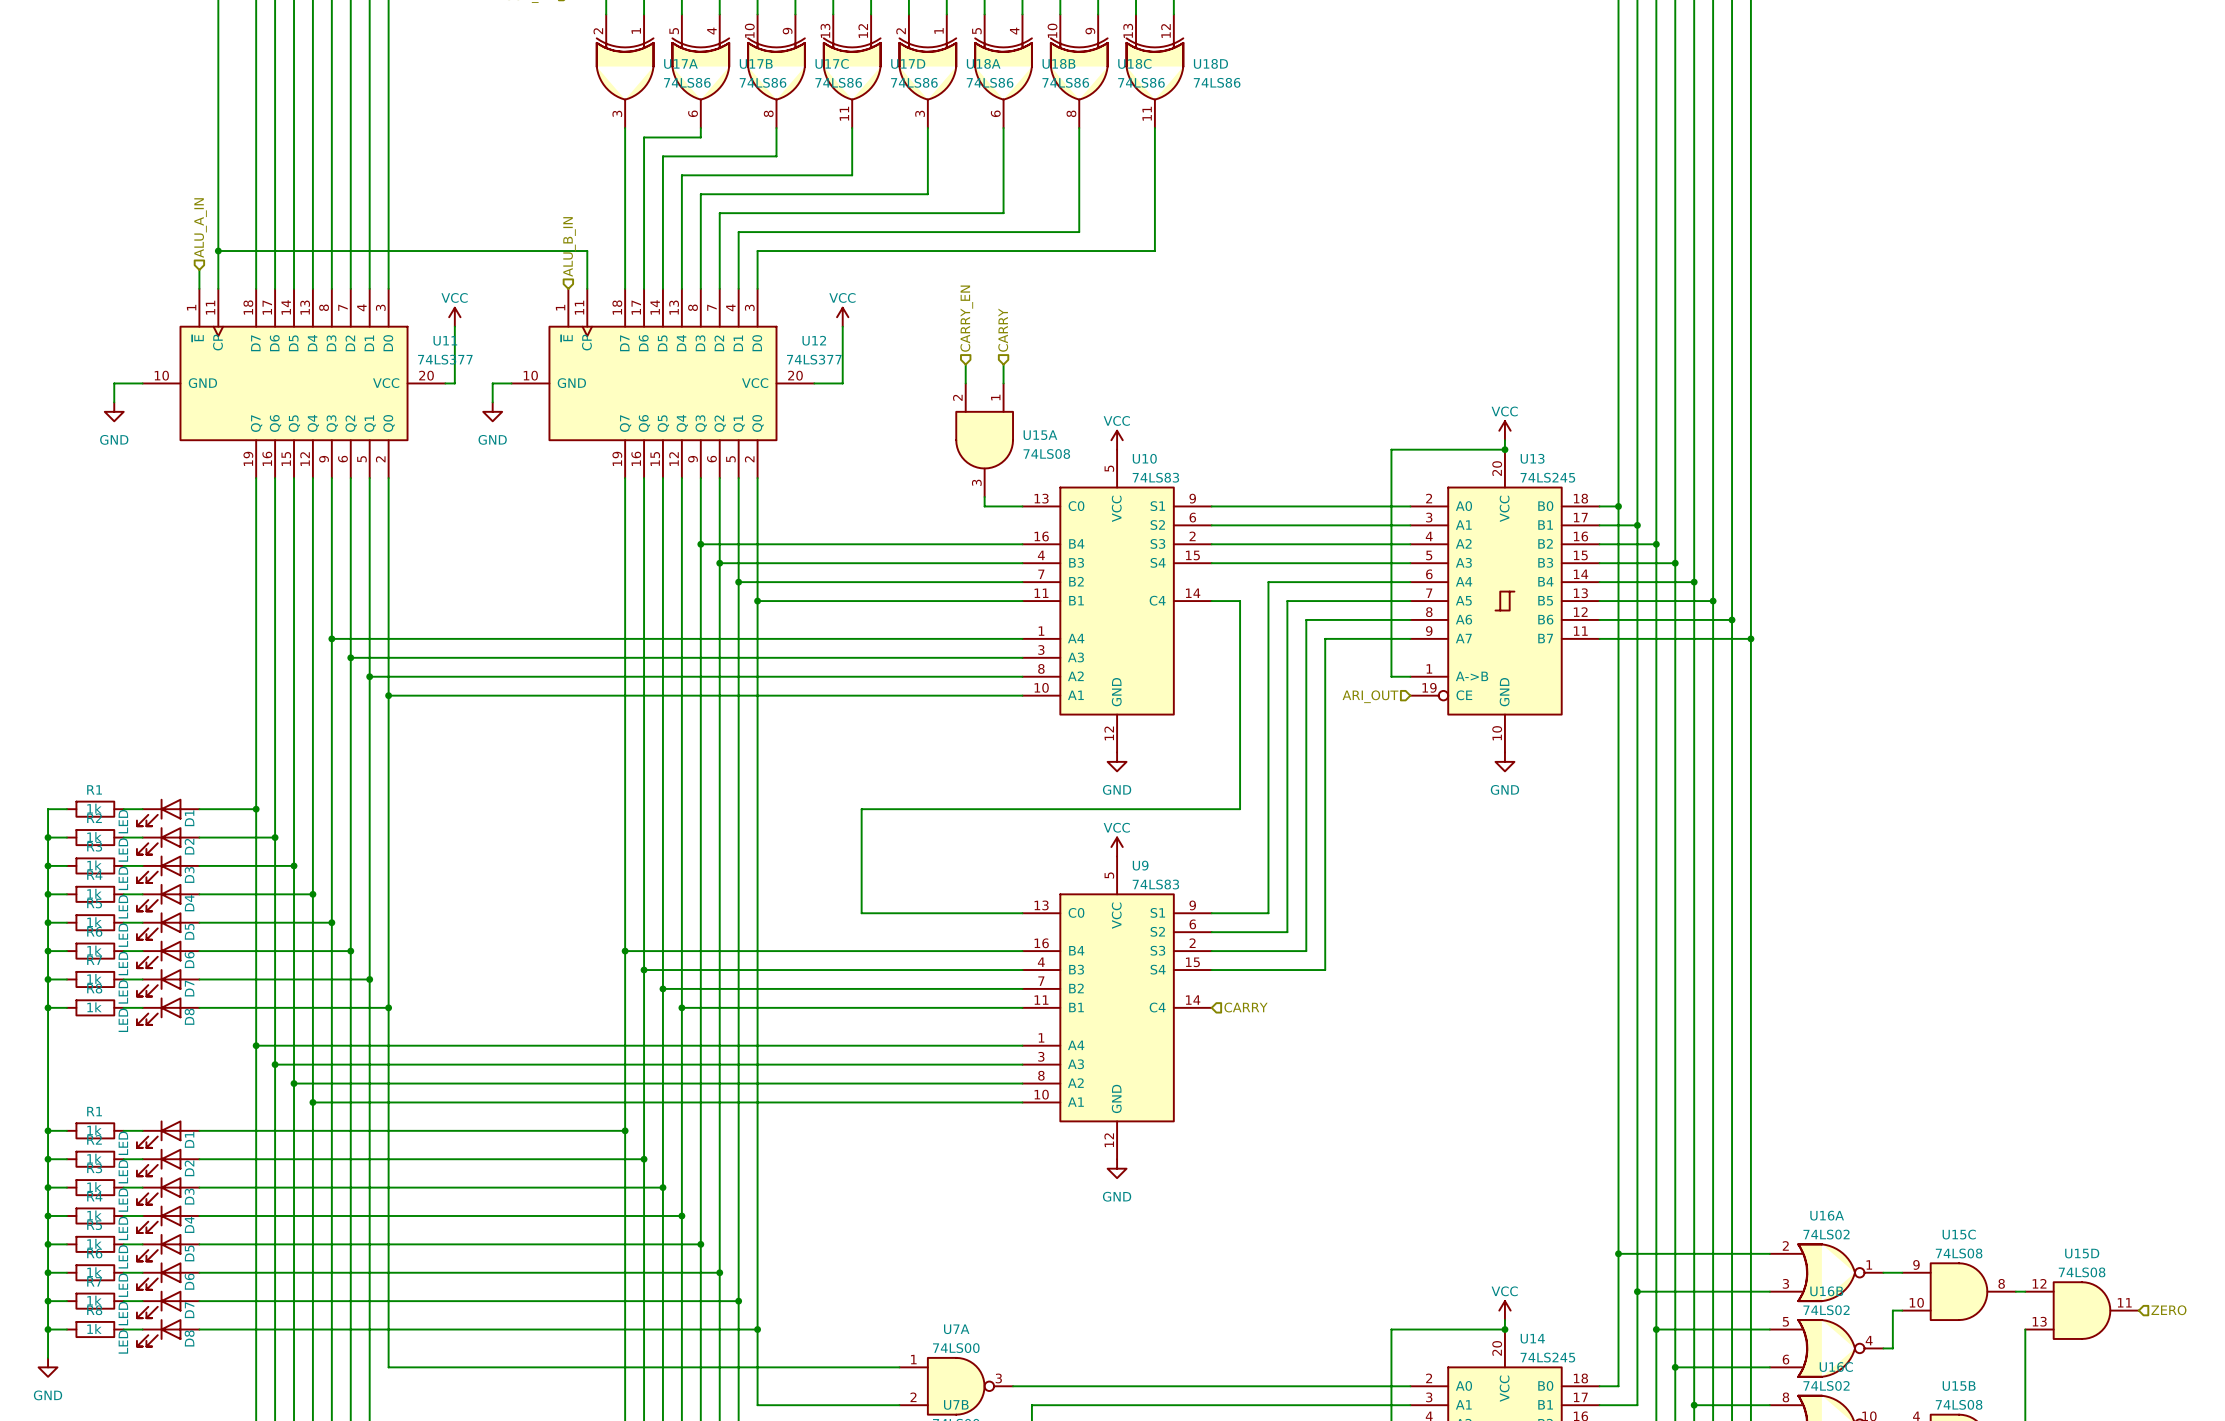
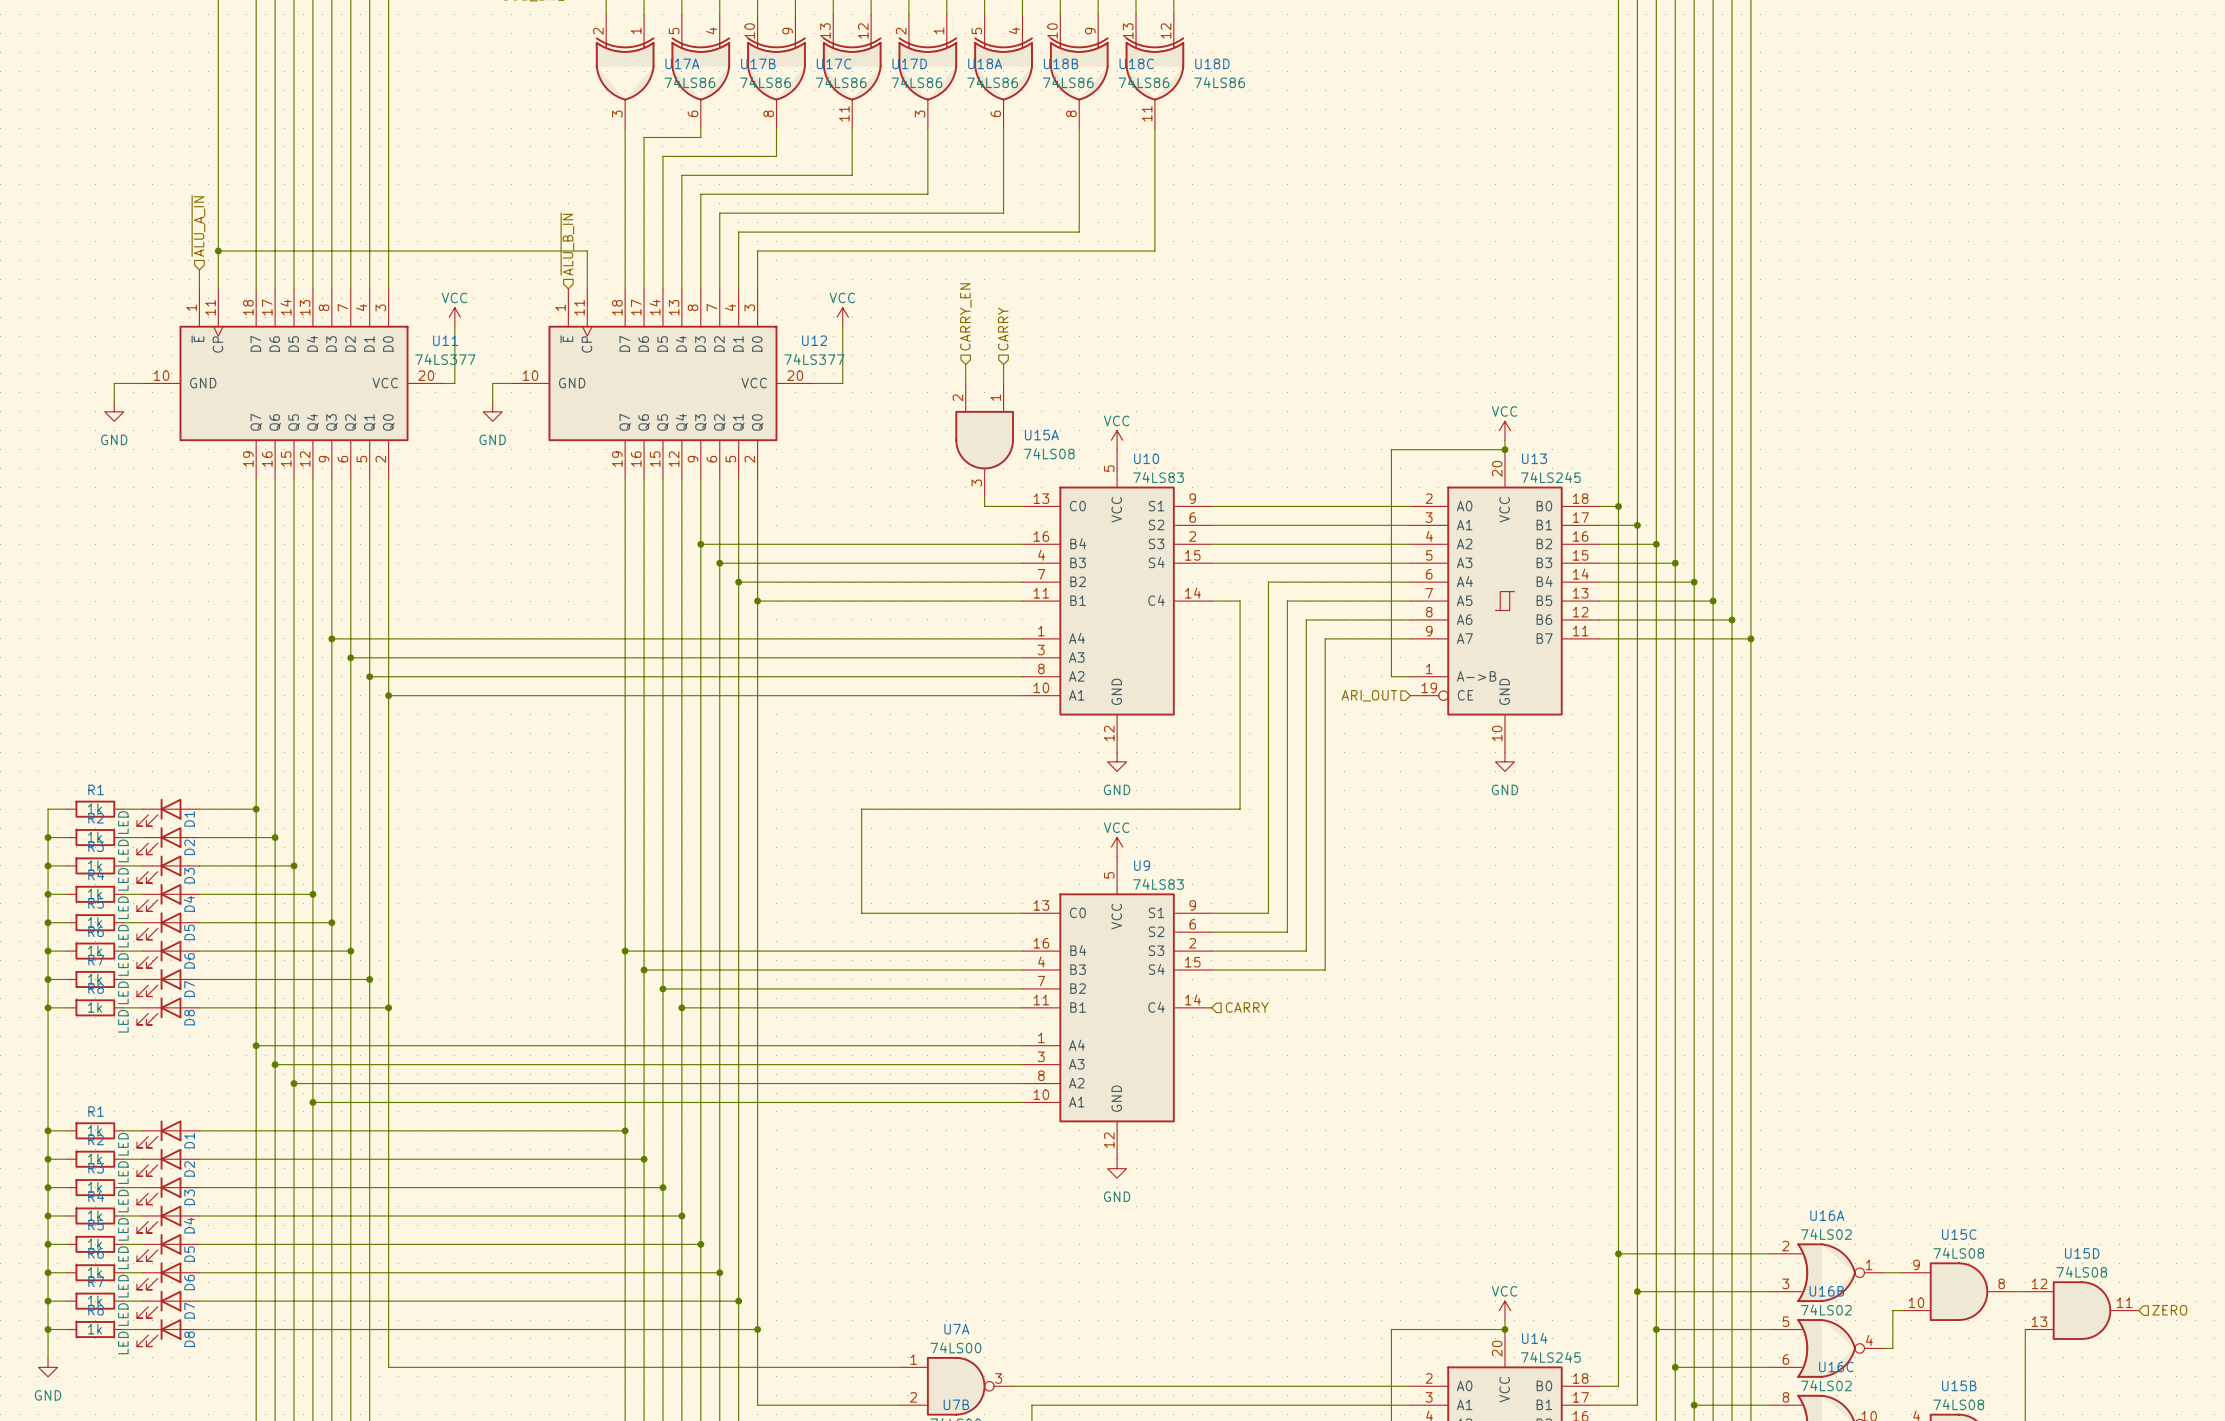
hierarchical label: ALU_A_IN (200, 228) -> ~{ALU_A_IN} (198, 225)
hierarchical label: ALU_B_IN (569, 246) -> ~{ALU_B_IN} (567, 244)

